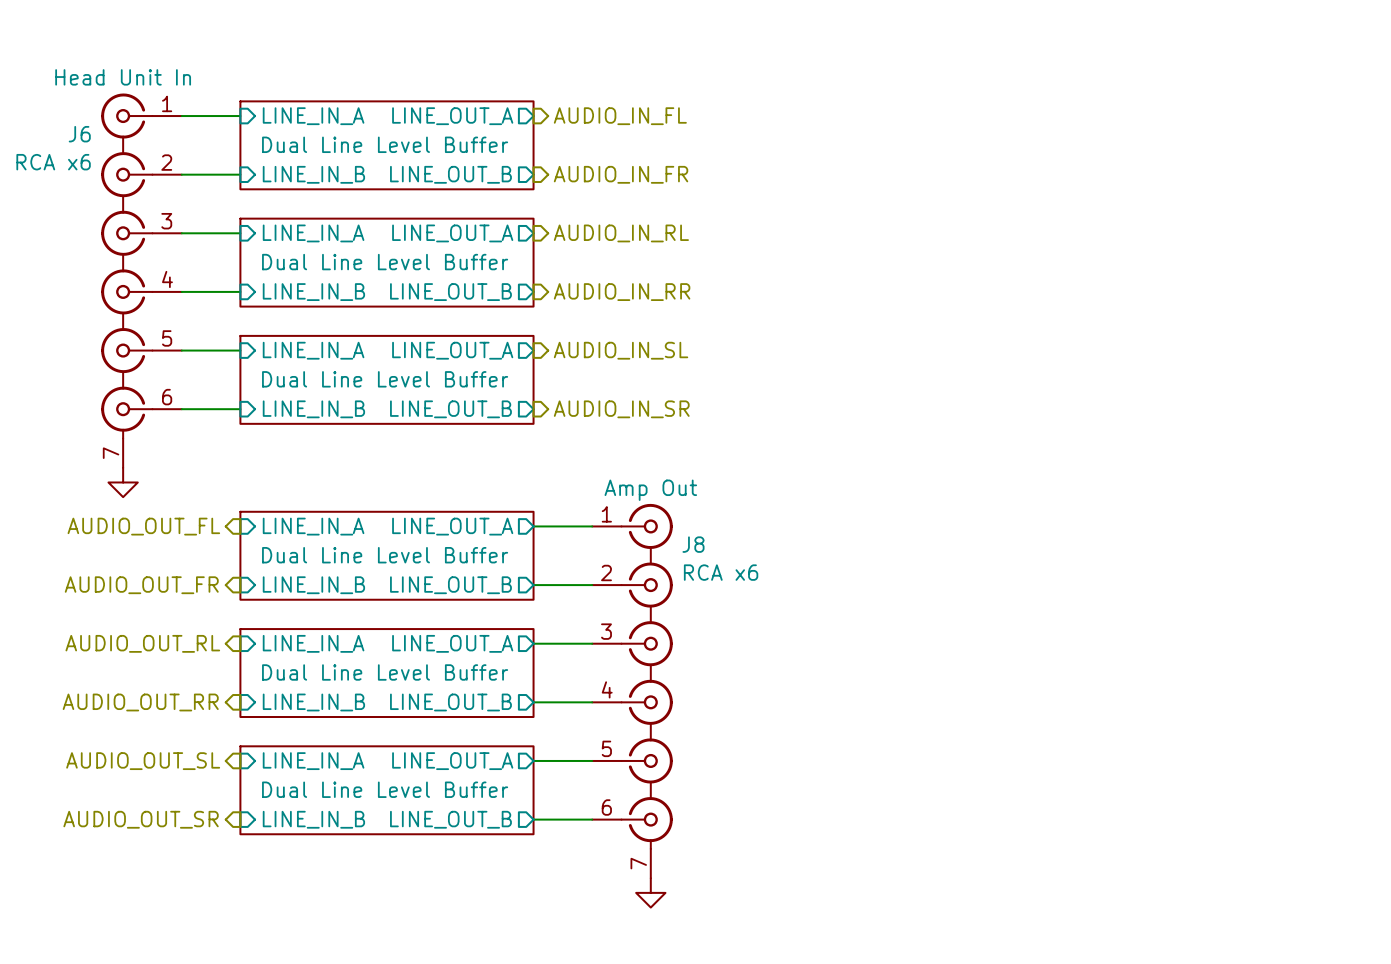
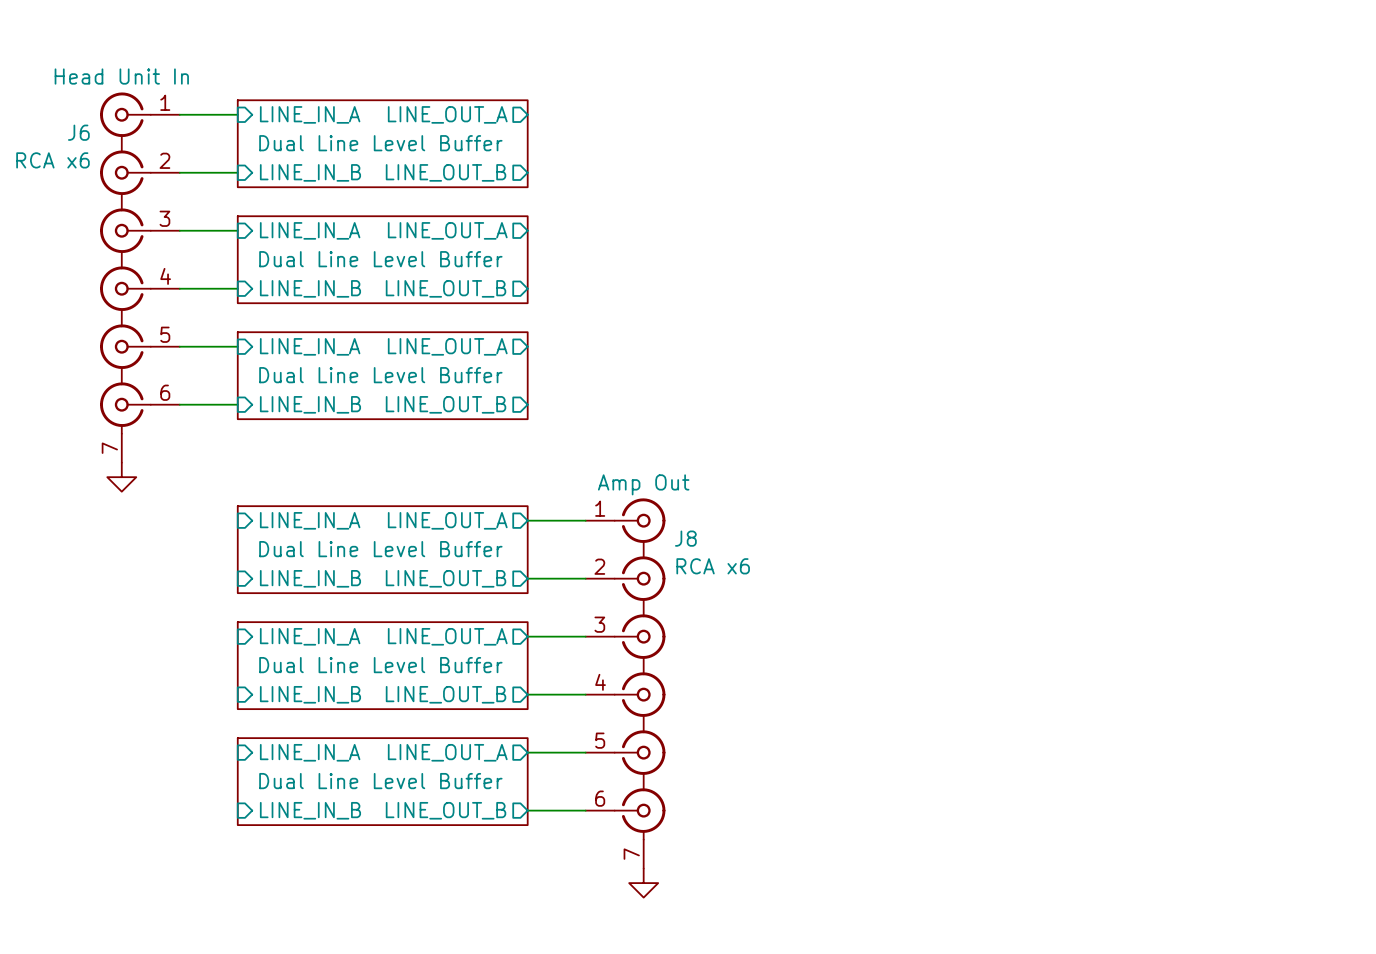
hierarchical label: AUDIO_IN_FL (620, 116) -> none
hierarchical label: AUDIO_IN_FR (621, 174) -> none
hierarchical label: AUDIO_IN_RL (621, 233) -> none
hierarchical label: AUDIO_IN_RR (622, 292) -> none
hierarchical label: AUDIO_IN_SL (621, 350) -> none
hierarchical label: AUDIO_IN_SR (621, 409) -> none
hierarchical label: AUDIO_OUT_FL (143, 526) -> none
hierarchical label: AUDIO_OUT_FR (141, 585) -> none
hierarchical label: AUDIO_OUT_RL (142, 643) -> none
hierarchical label: AUDIO_OUT_RR (140, 702) -> none
hierarchical label: AUDIO_OUT_SL (143, 761) -> none
hierarchical label: AUDIO_OUT_SR (141, 819) -> none

